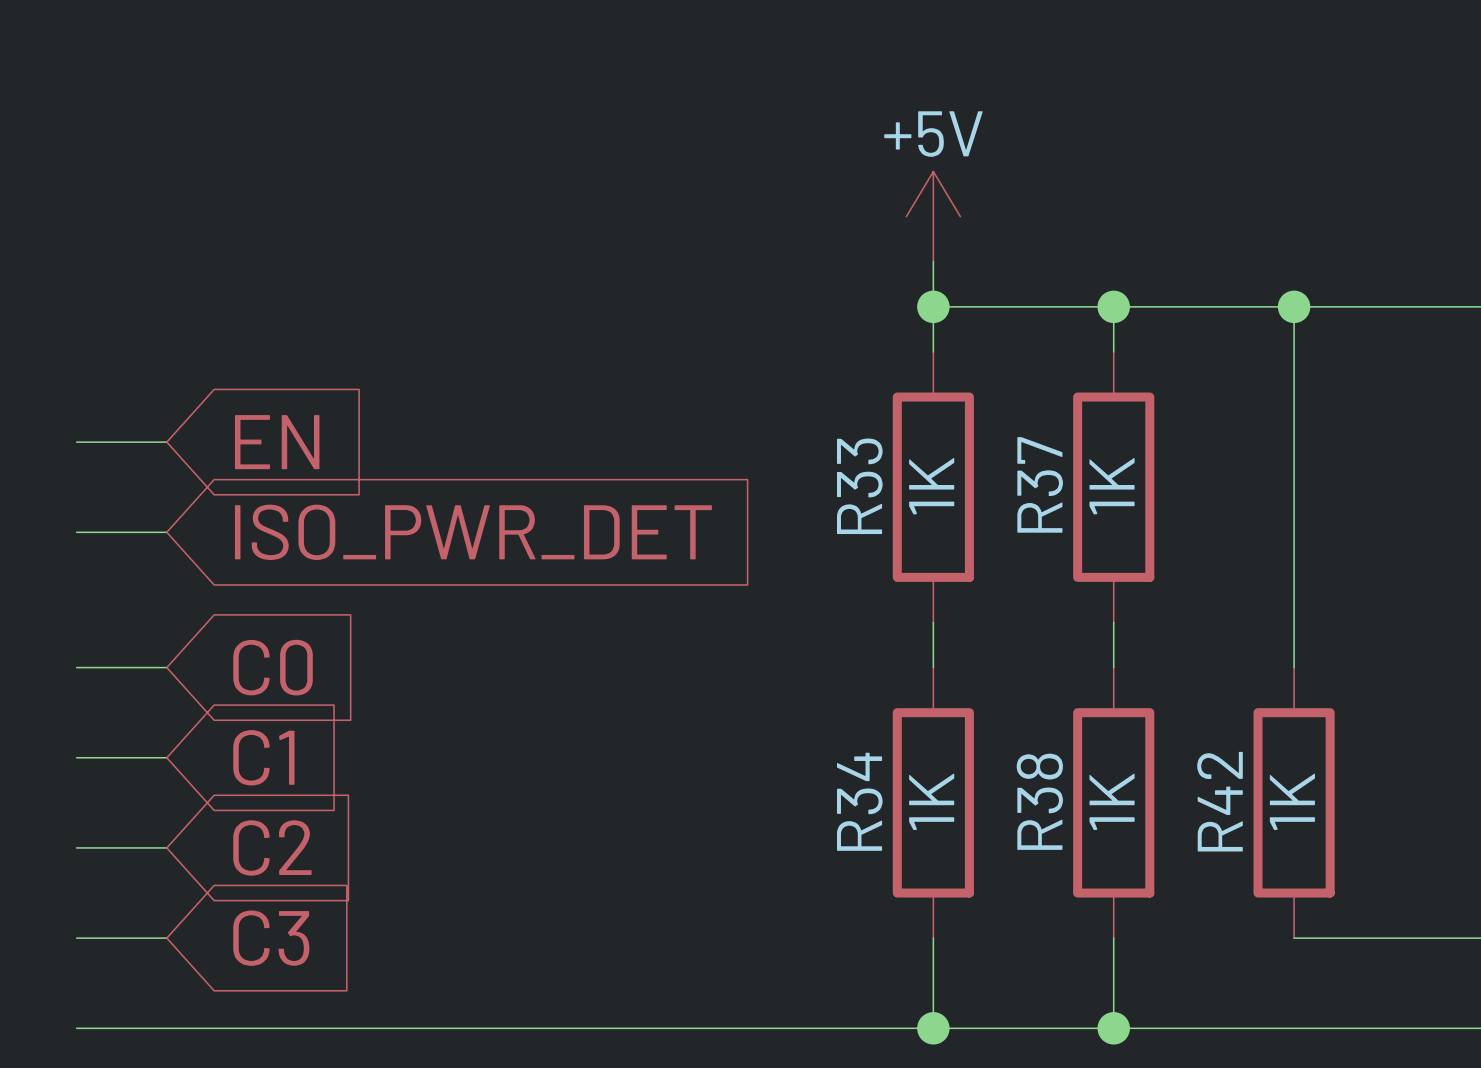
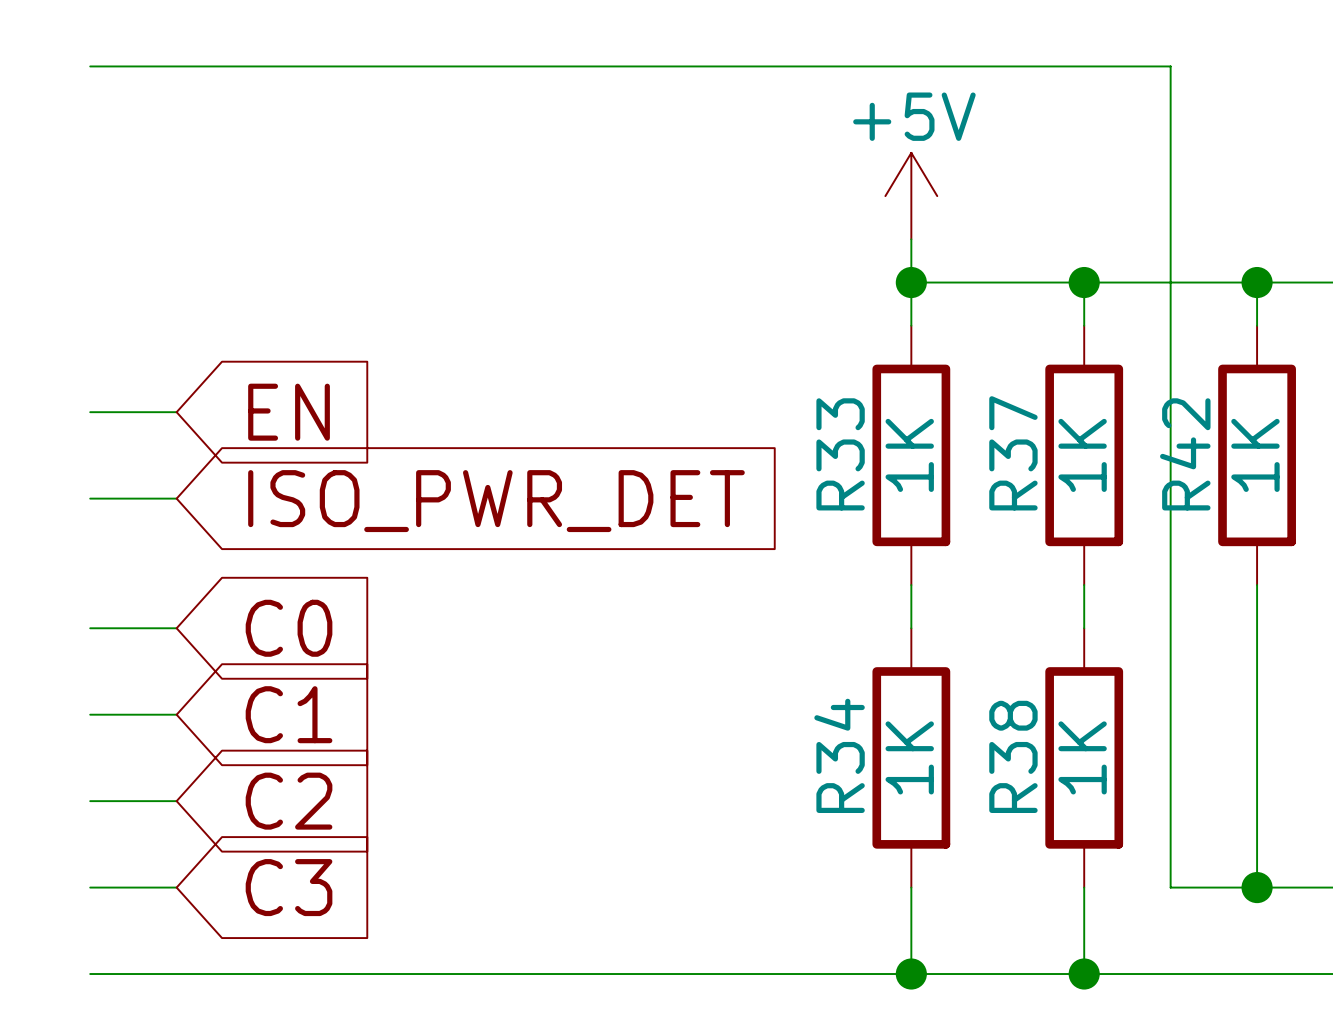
wire: none -> (90, 66) (1170, 66) (1170, 887) (1257, 887) (1257, 628)
wire: (1294, 351) (1294, 622) -> none
R42 position: (1294, 802) -> (1257, 455)
junction: none -> (1257, 887)

